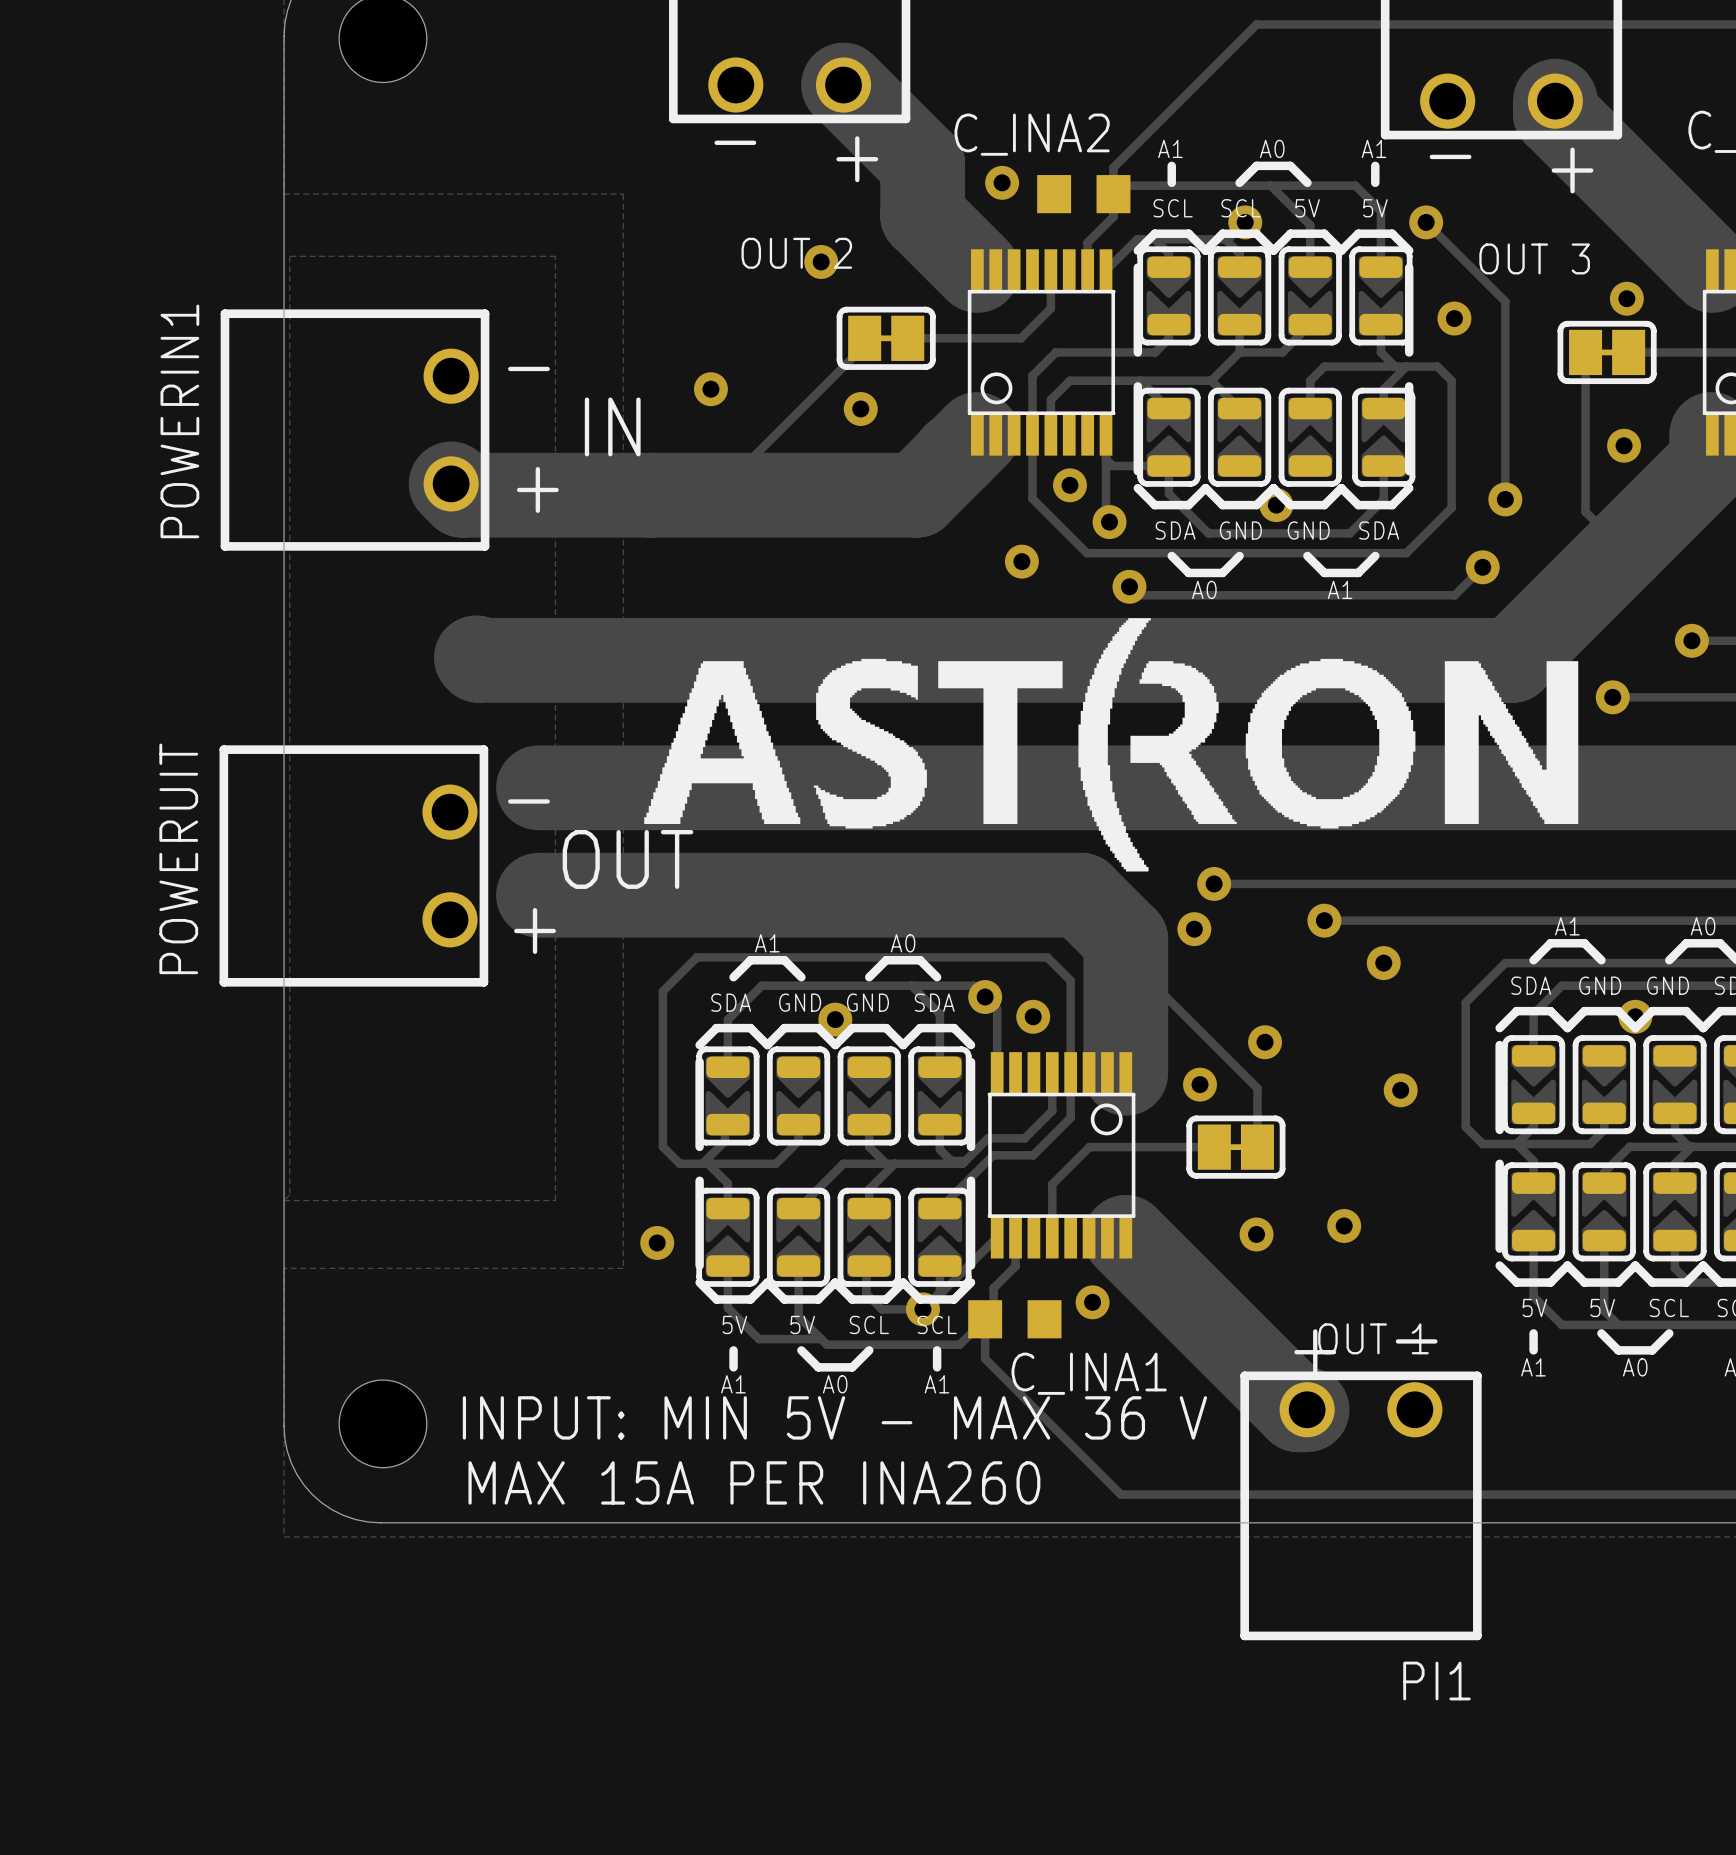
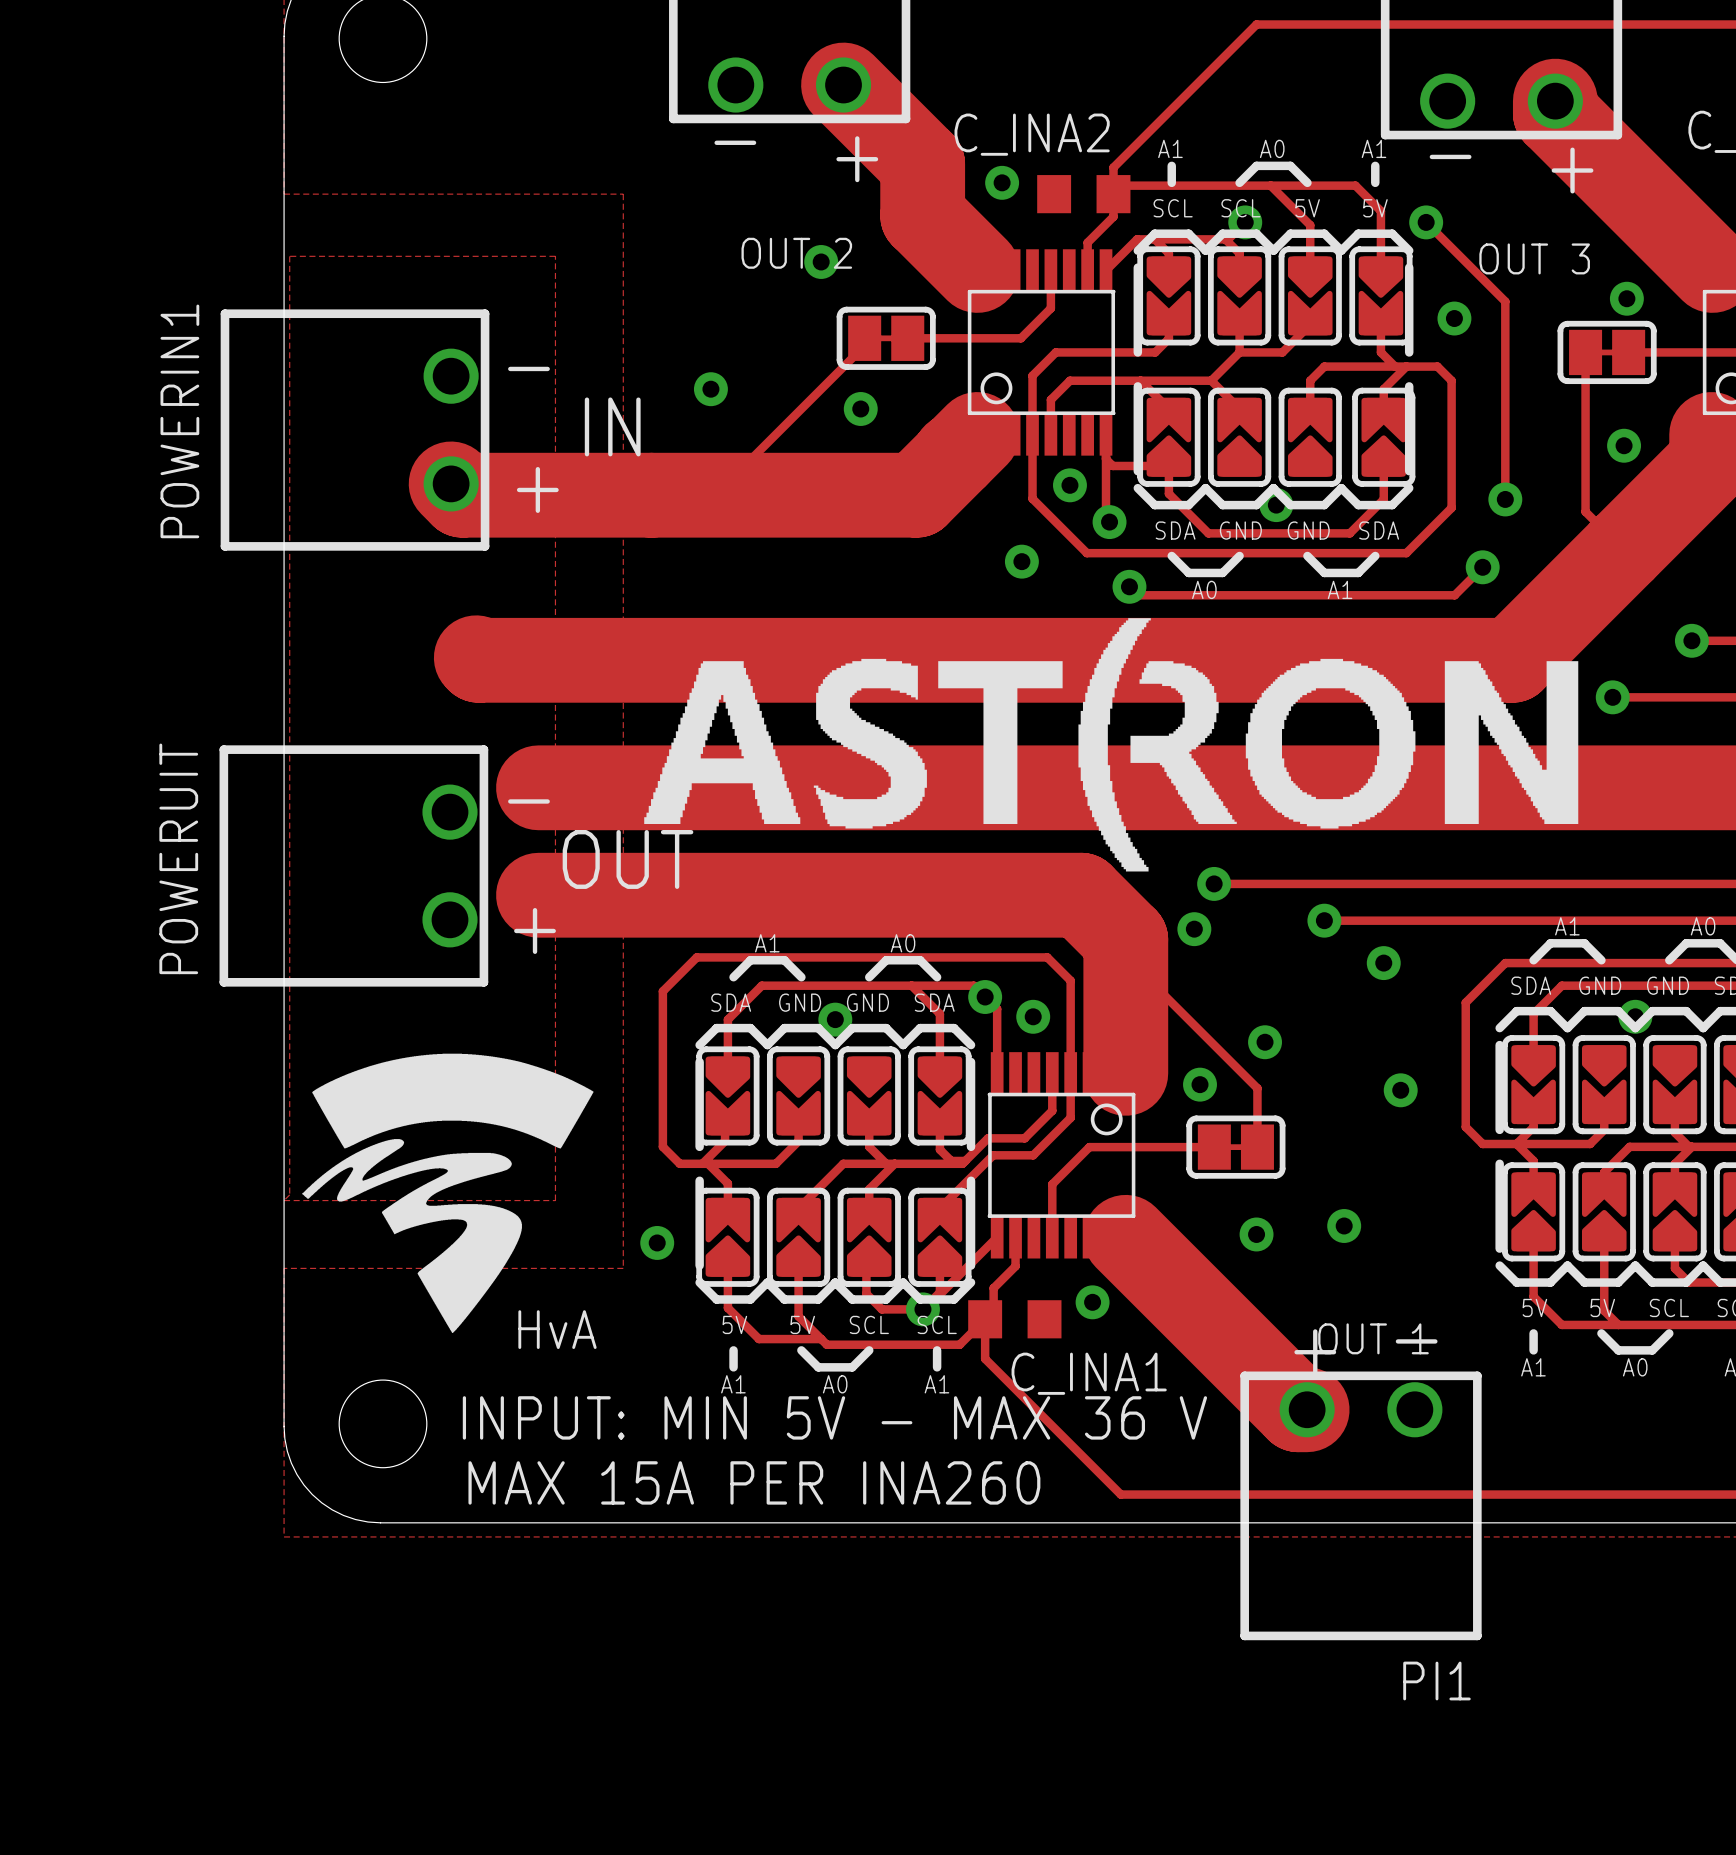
drawing: none -> [302, 1053, 594, 1334]
text: none -> HvA (557, 1329)

